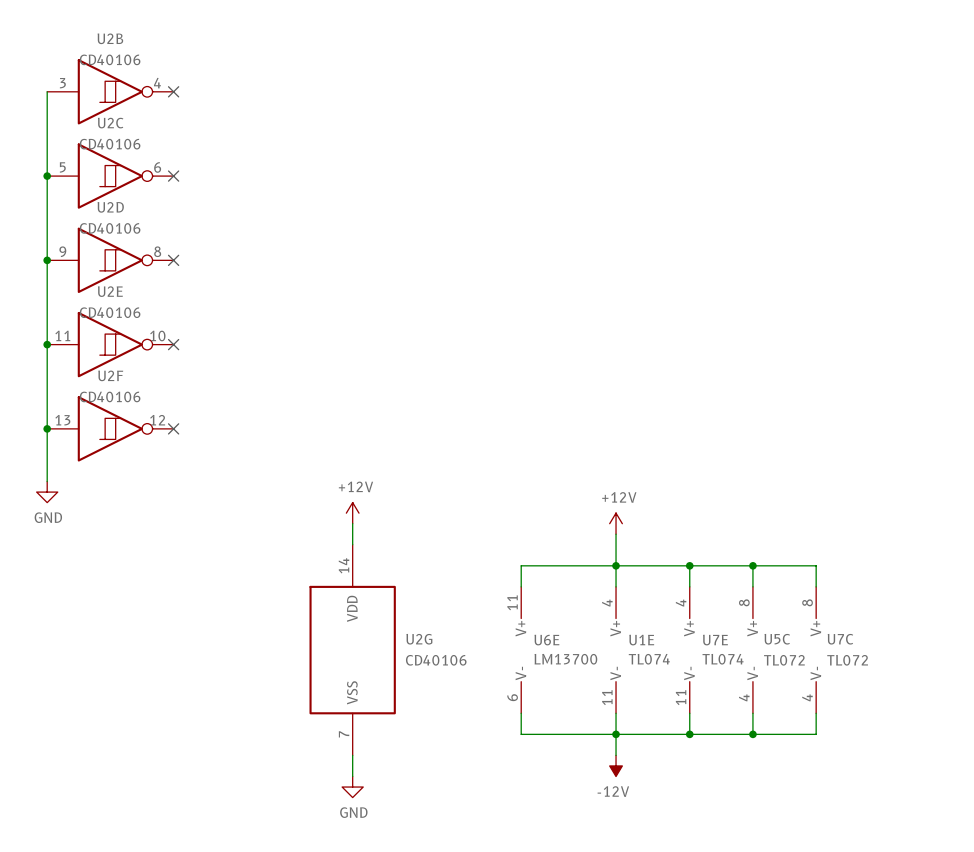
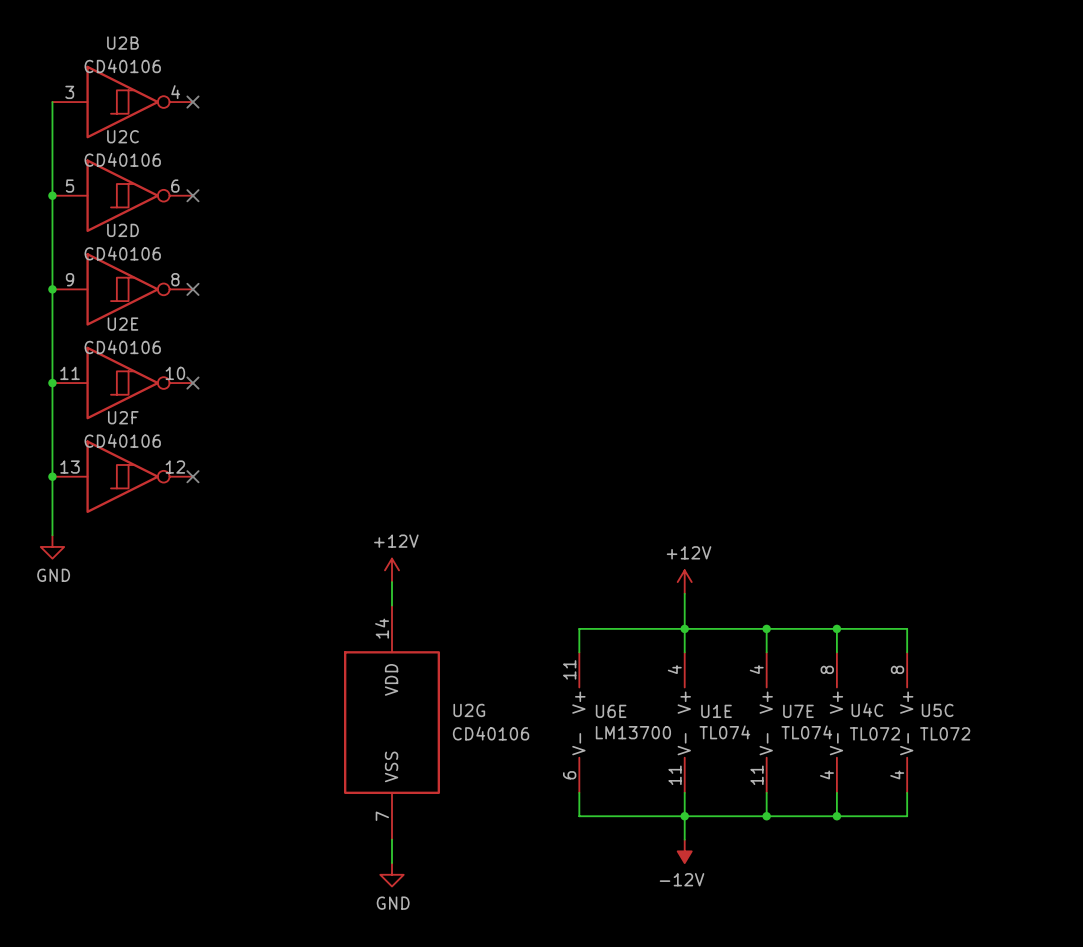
U5C name: U5C (777, 639) -> U4C (867, 710)
U7C name: U7C (840, 639) -> U5C (937, 710)

